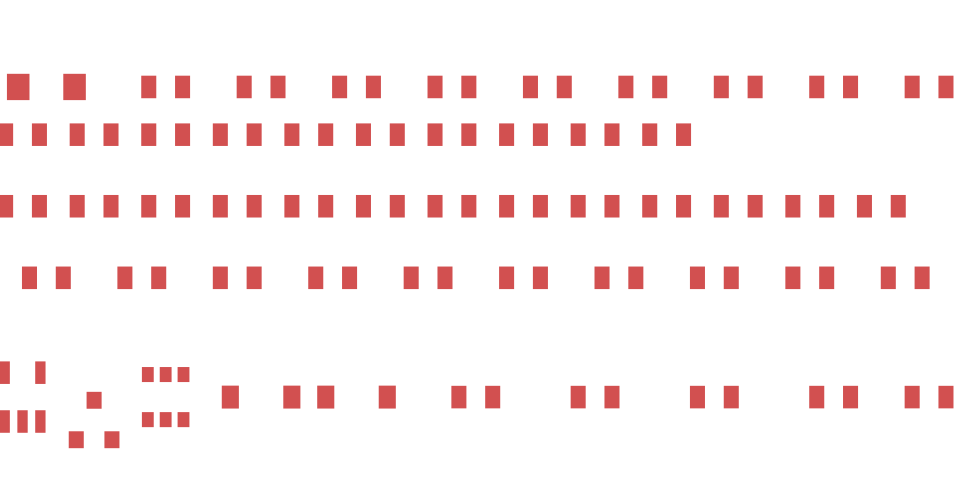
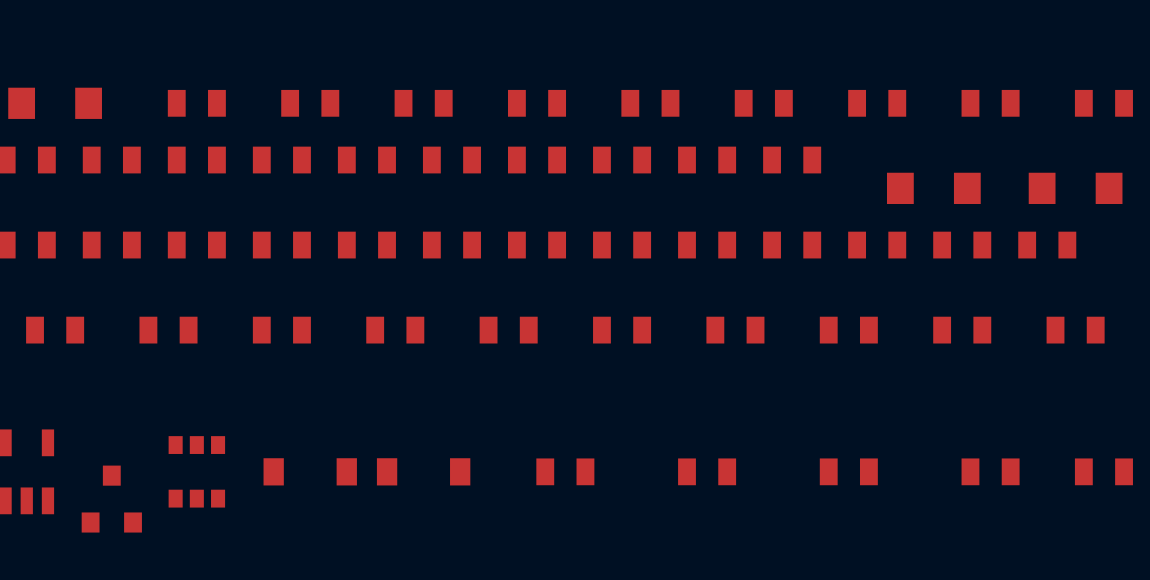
part: none -> (933, 188)
part: none -> (1075, 188)

